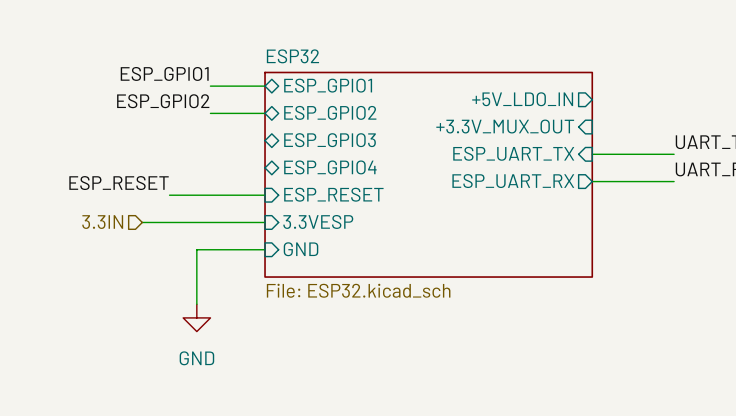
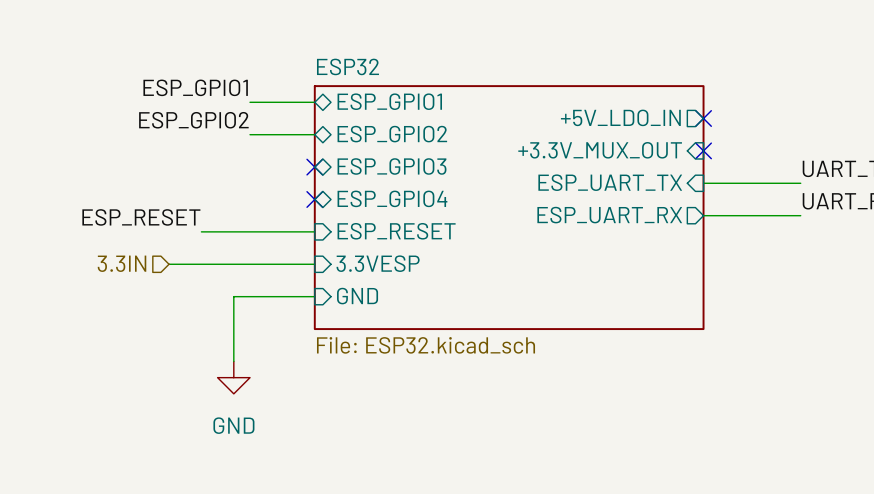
no-connect mark: none -> (703, 118)
no-connect mark: none -> (703, 150)
no-connect mark: none -> (314, 167)
no-connect mark: none -> (314, 199)

